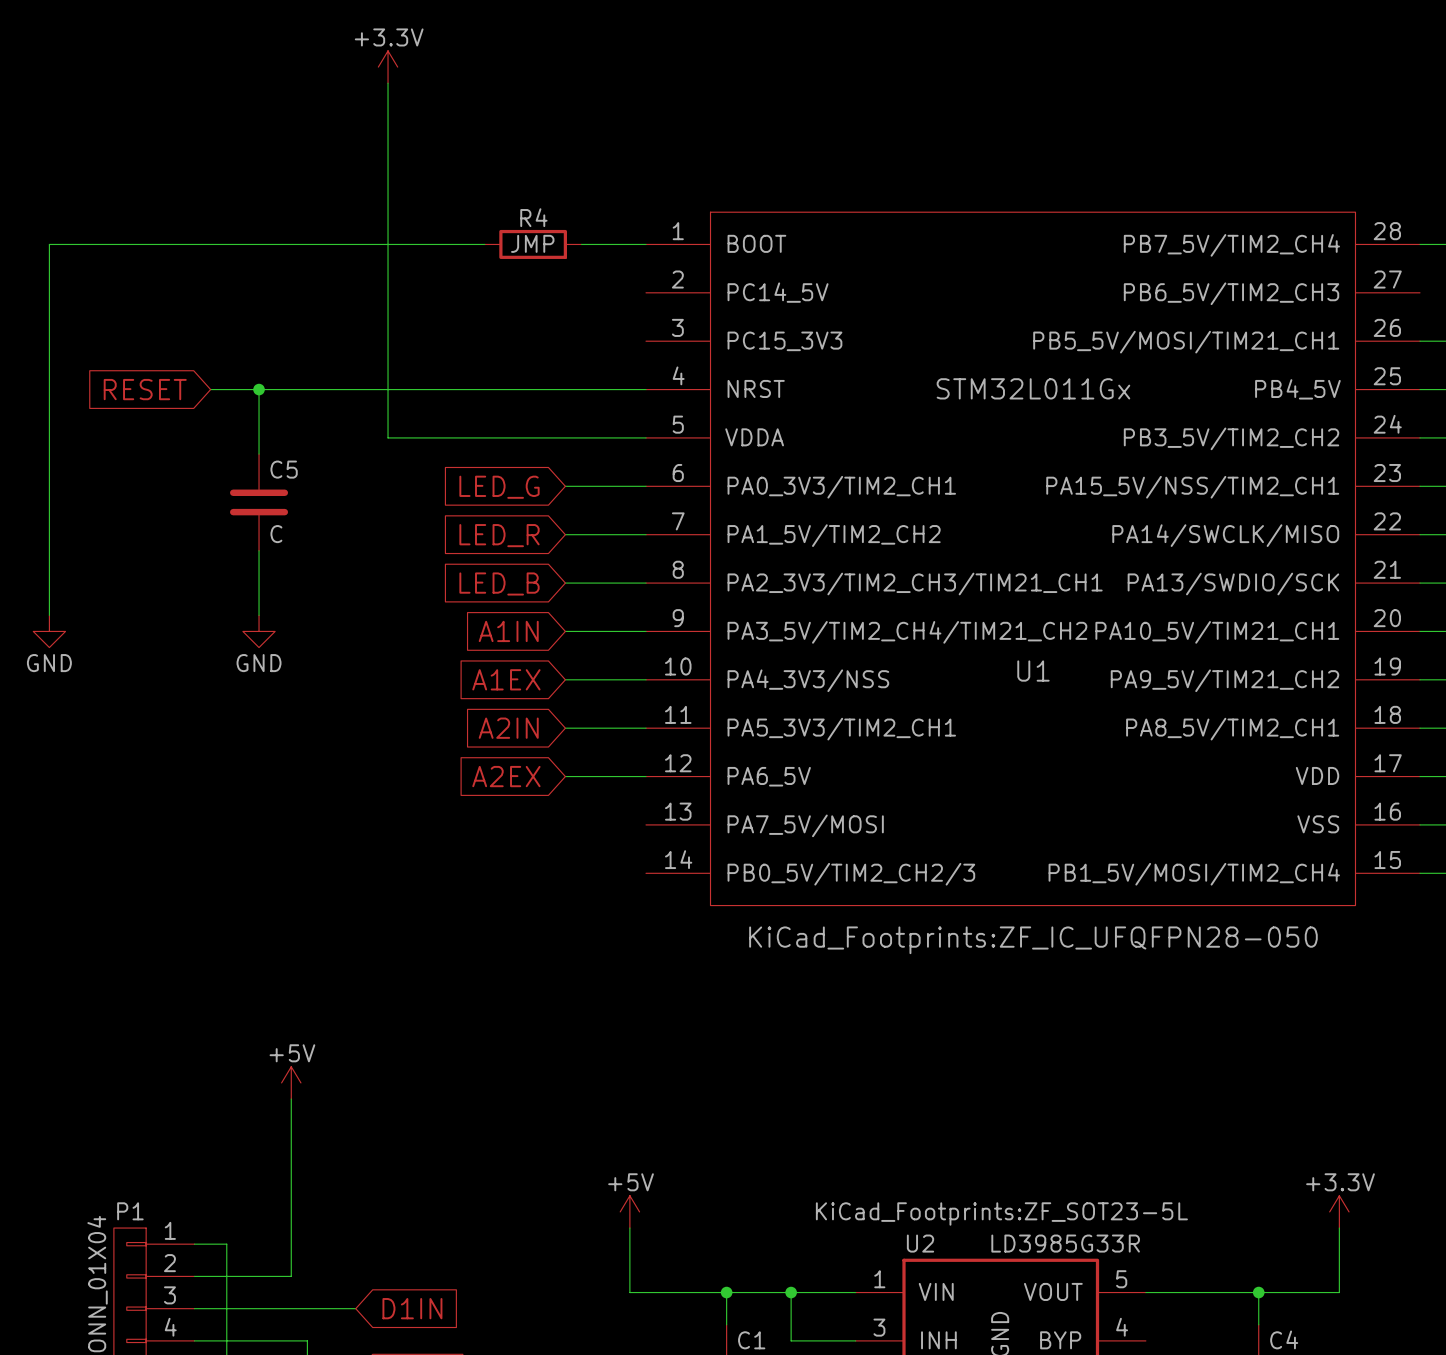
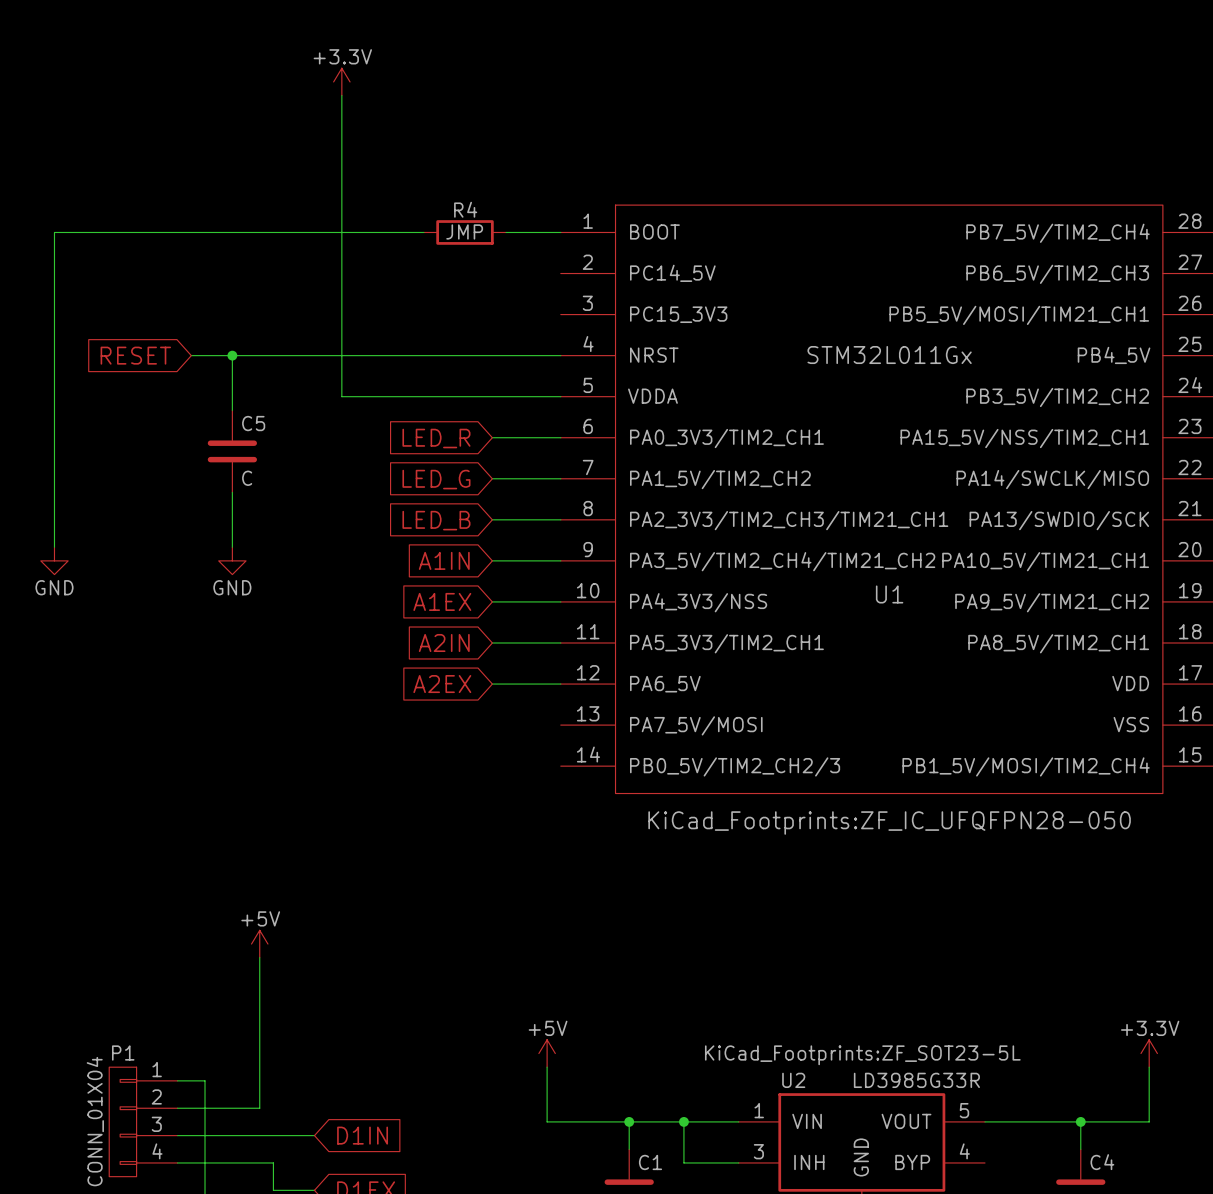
global label: LED_G (499, 487) -> LED_R (436, 438)
global label: LED_R (499, 535) -> LED_G (436, 479)

